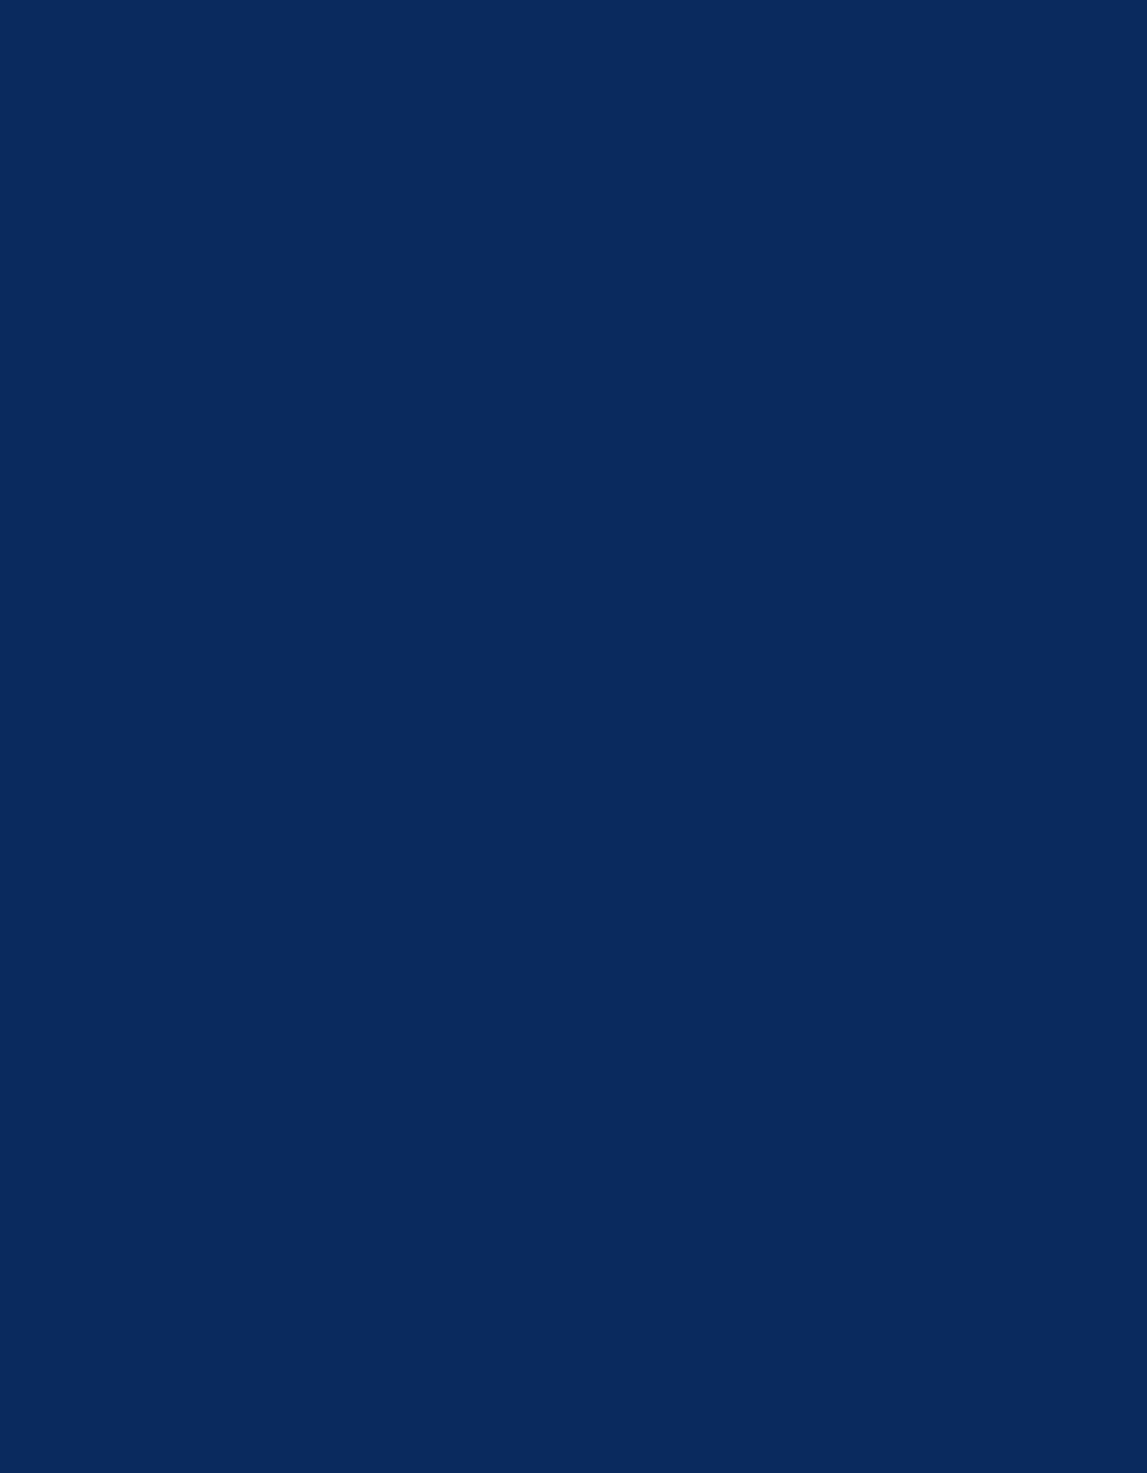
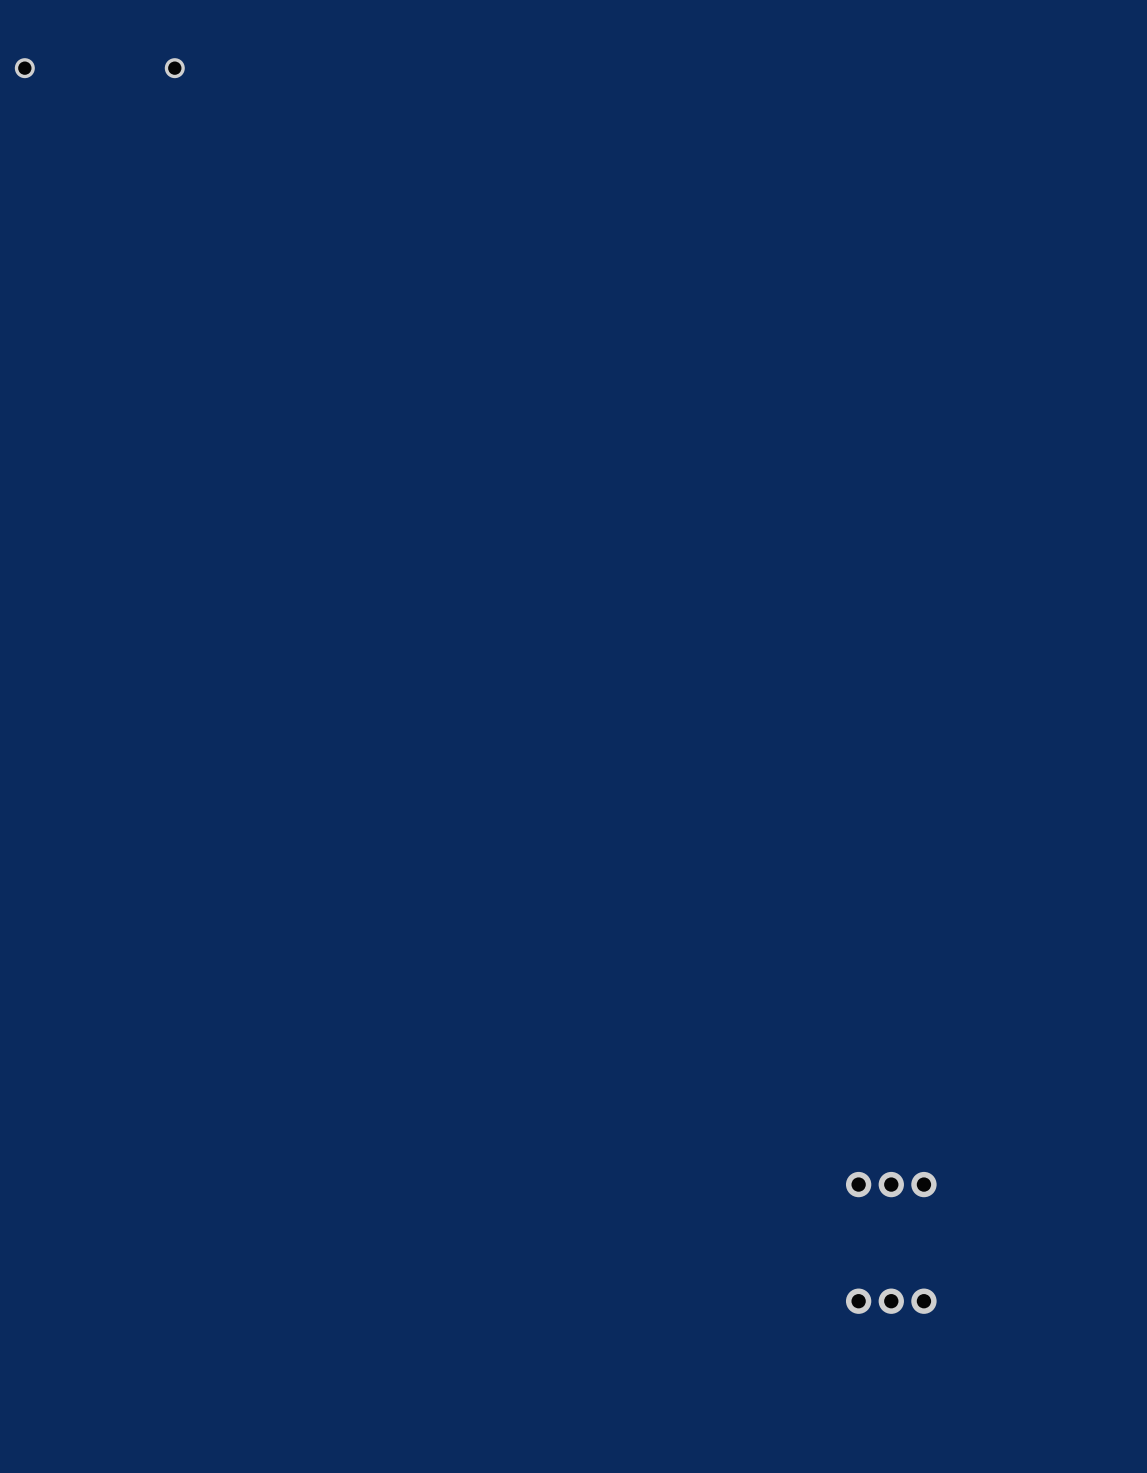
part: none -> (24, 68)
part: none -> (174, 68)
part: none -> (891, 1184)
part: none -> (891, 1301)

